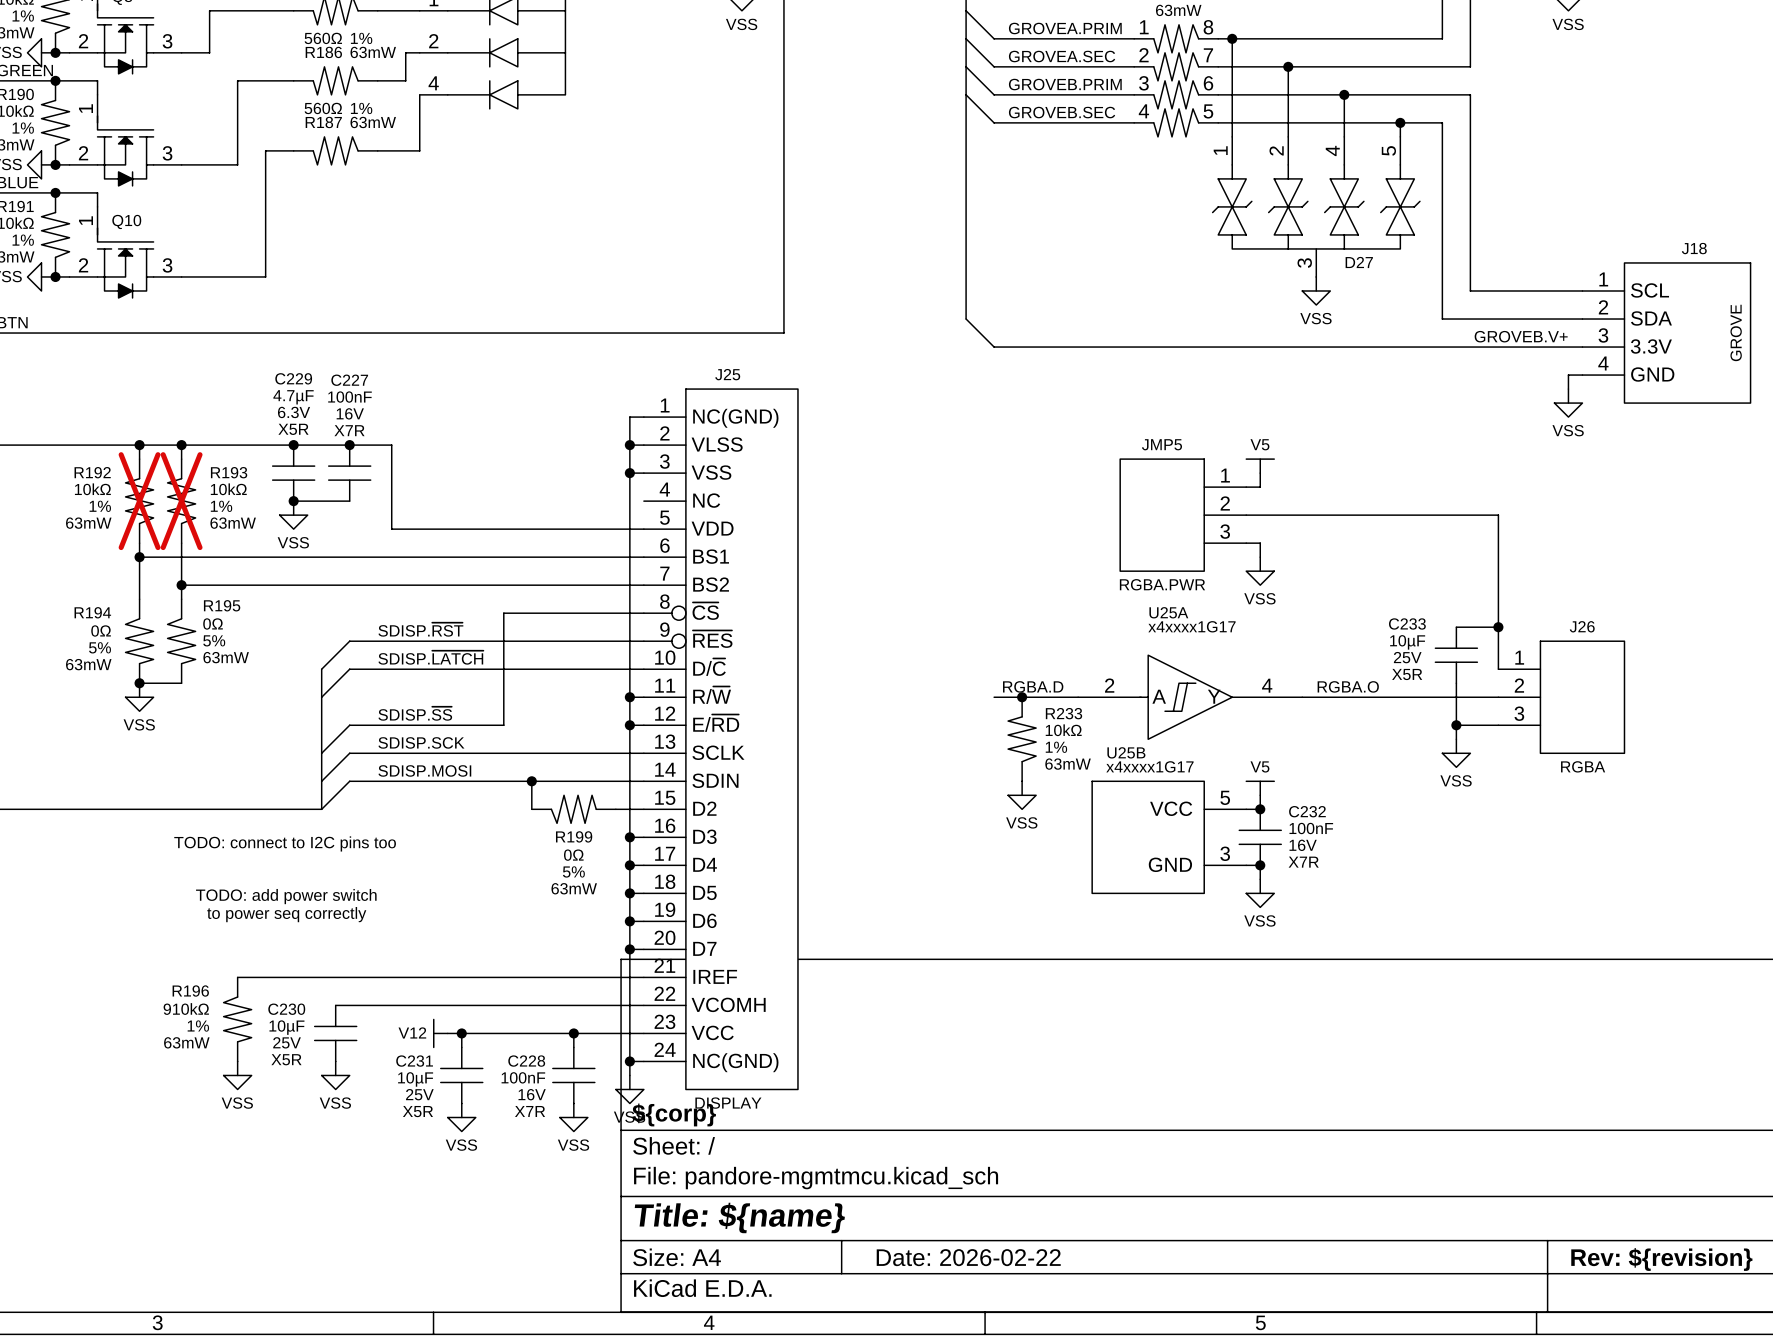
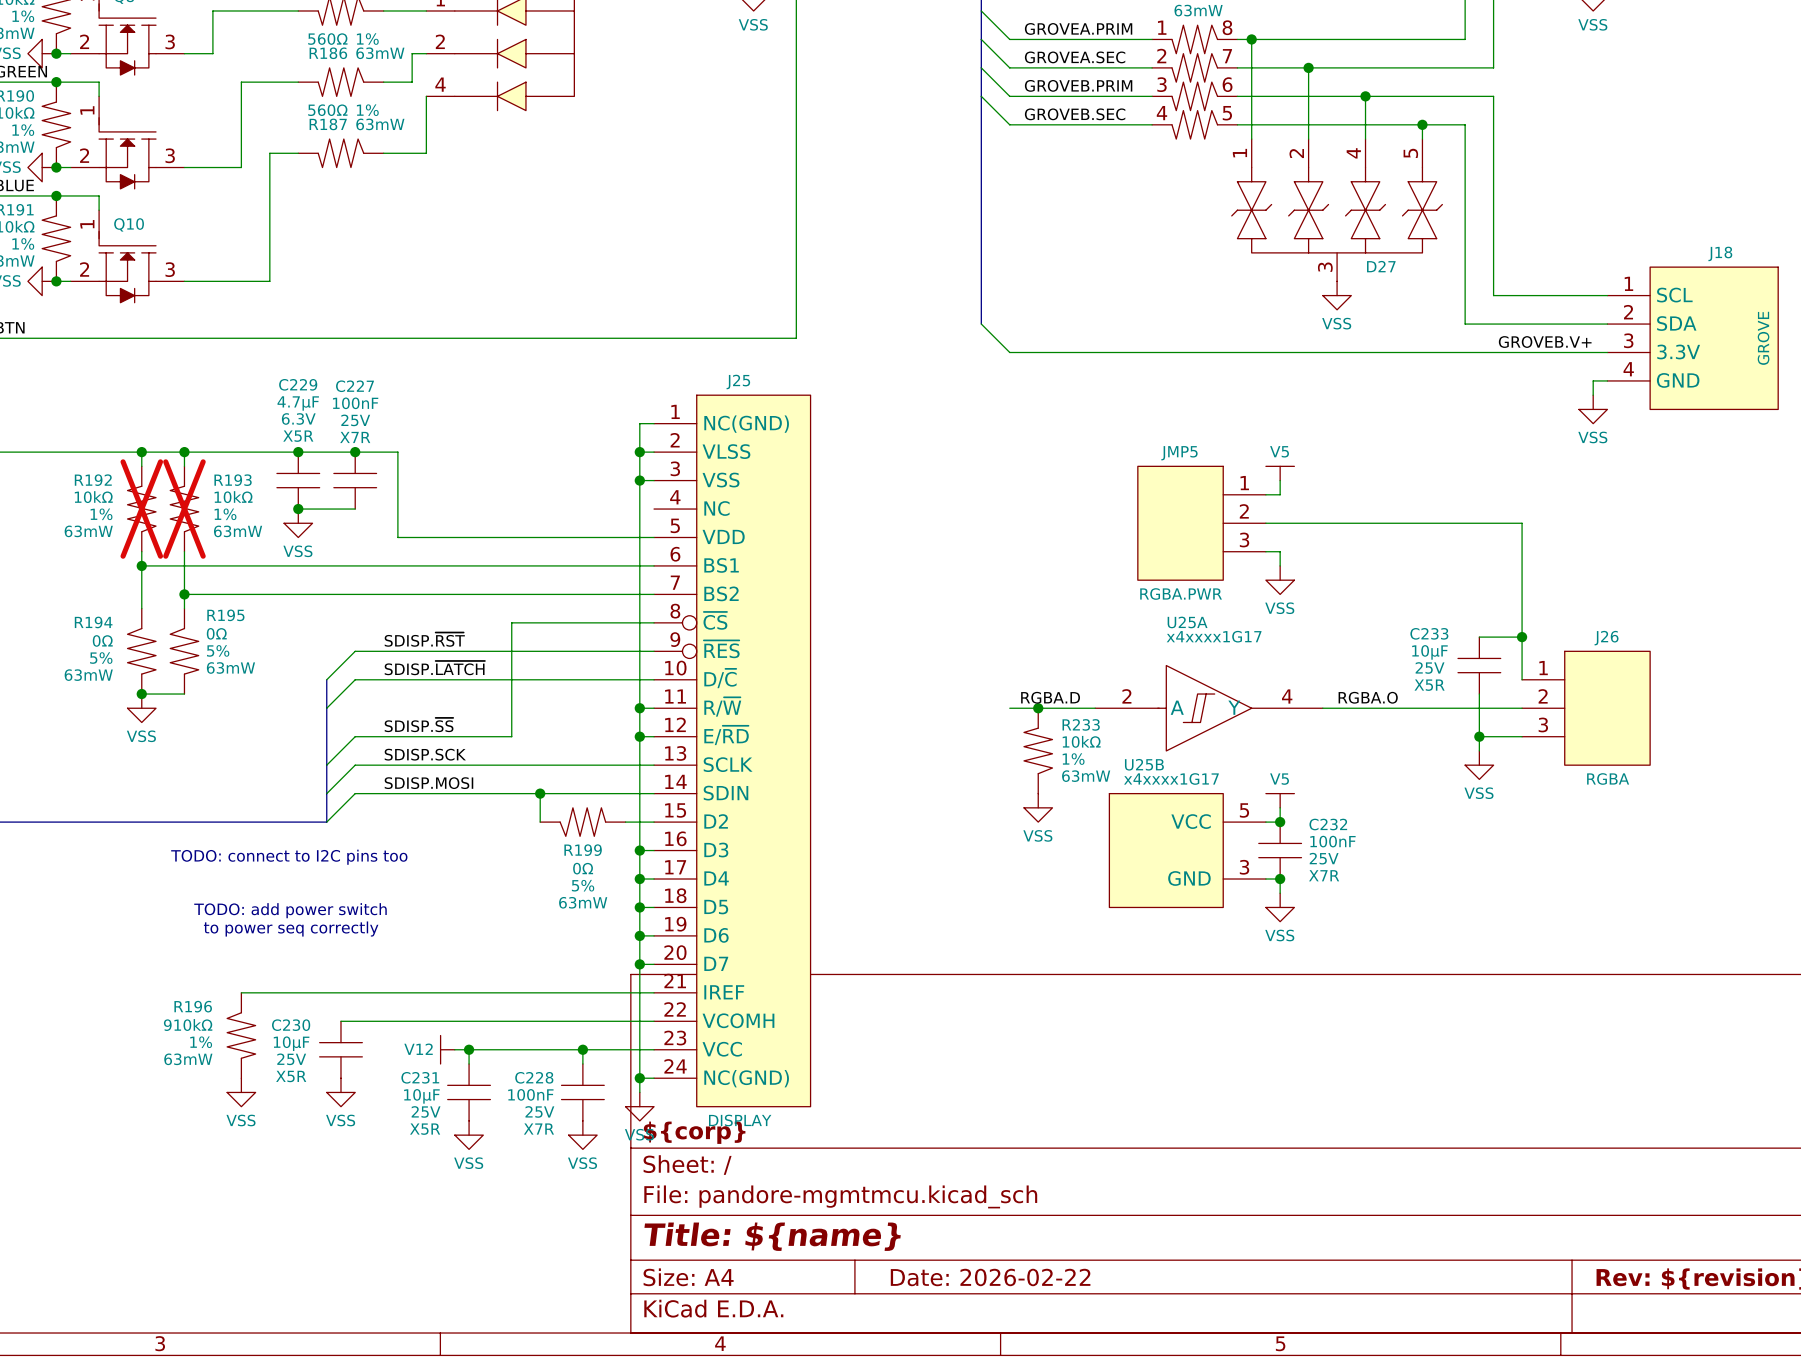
C227 text: 16V (350, 413) -> 25V (355, 420)
C232 text: 16V (1303, 845) -> 25V (1324, 858)
C228 text: 16V (532, 1094) -> 25V (539, 1111)

